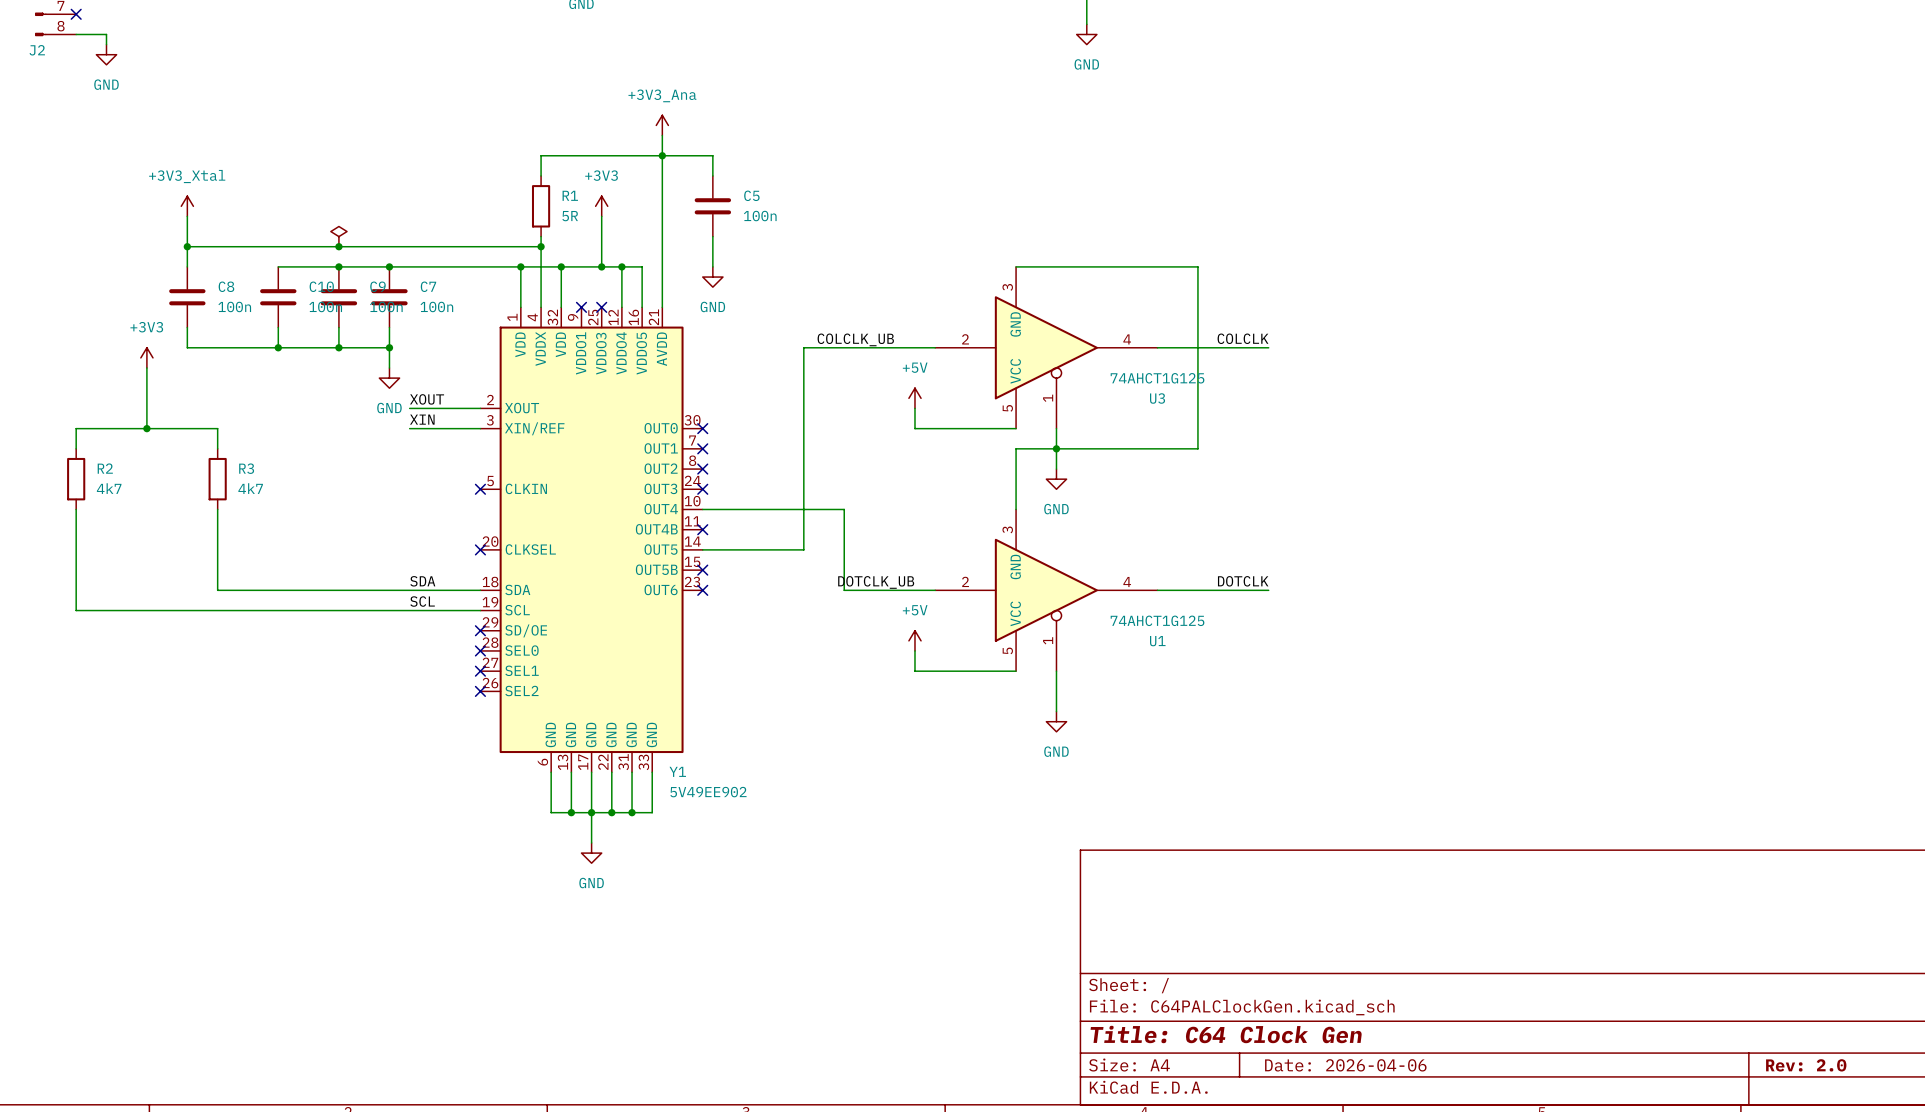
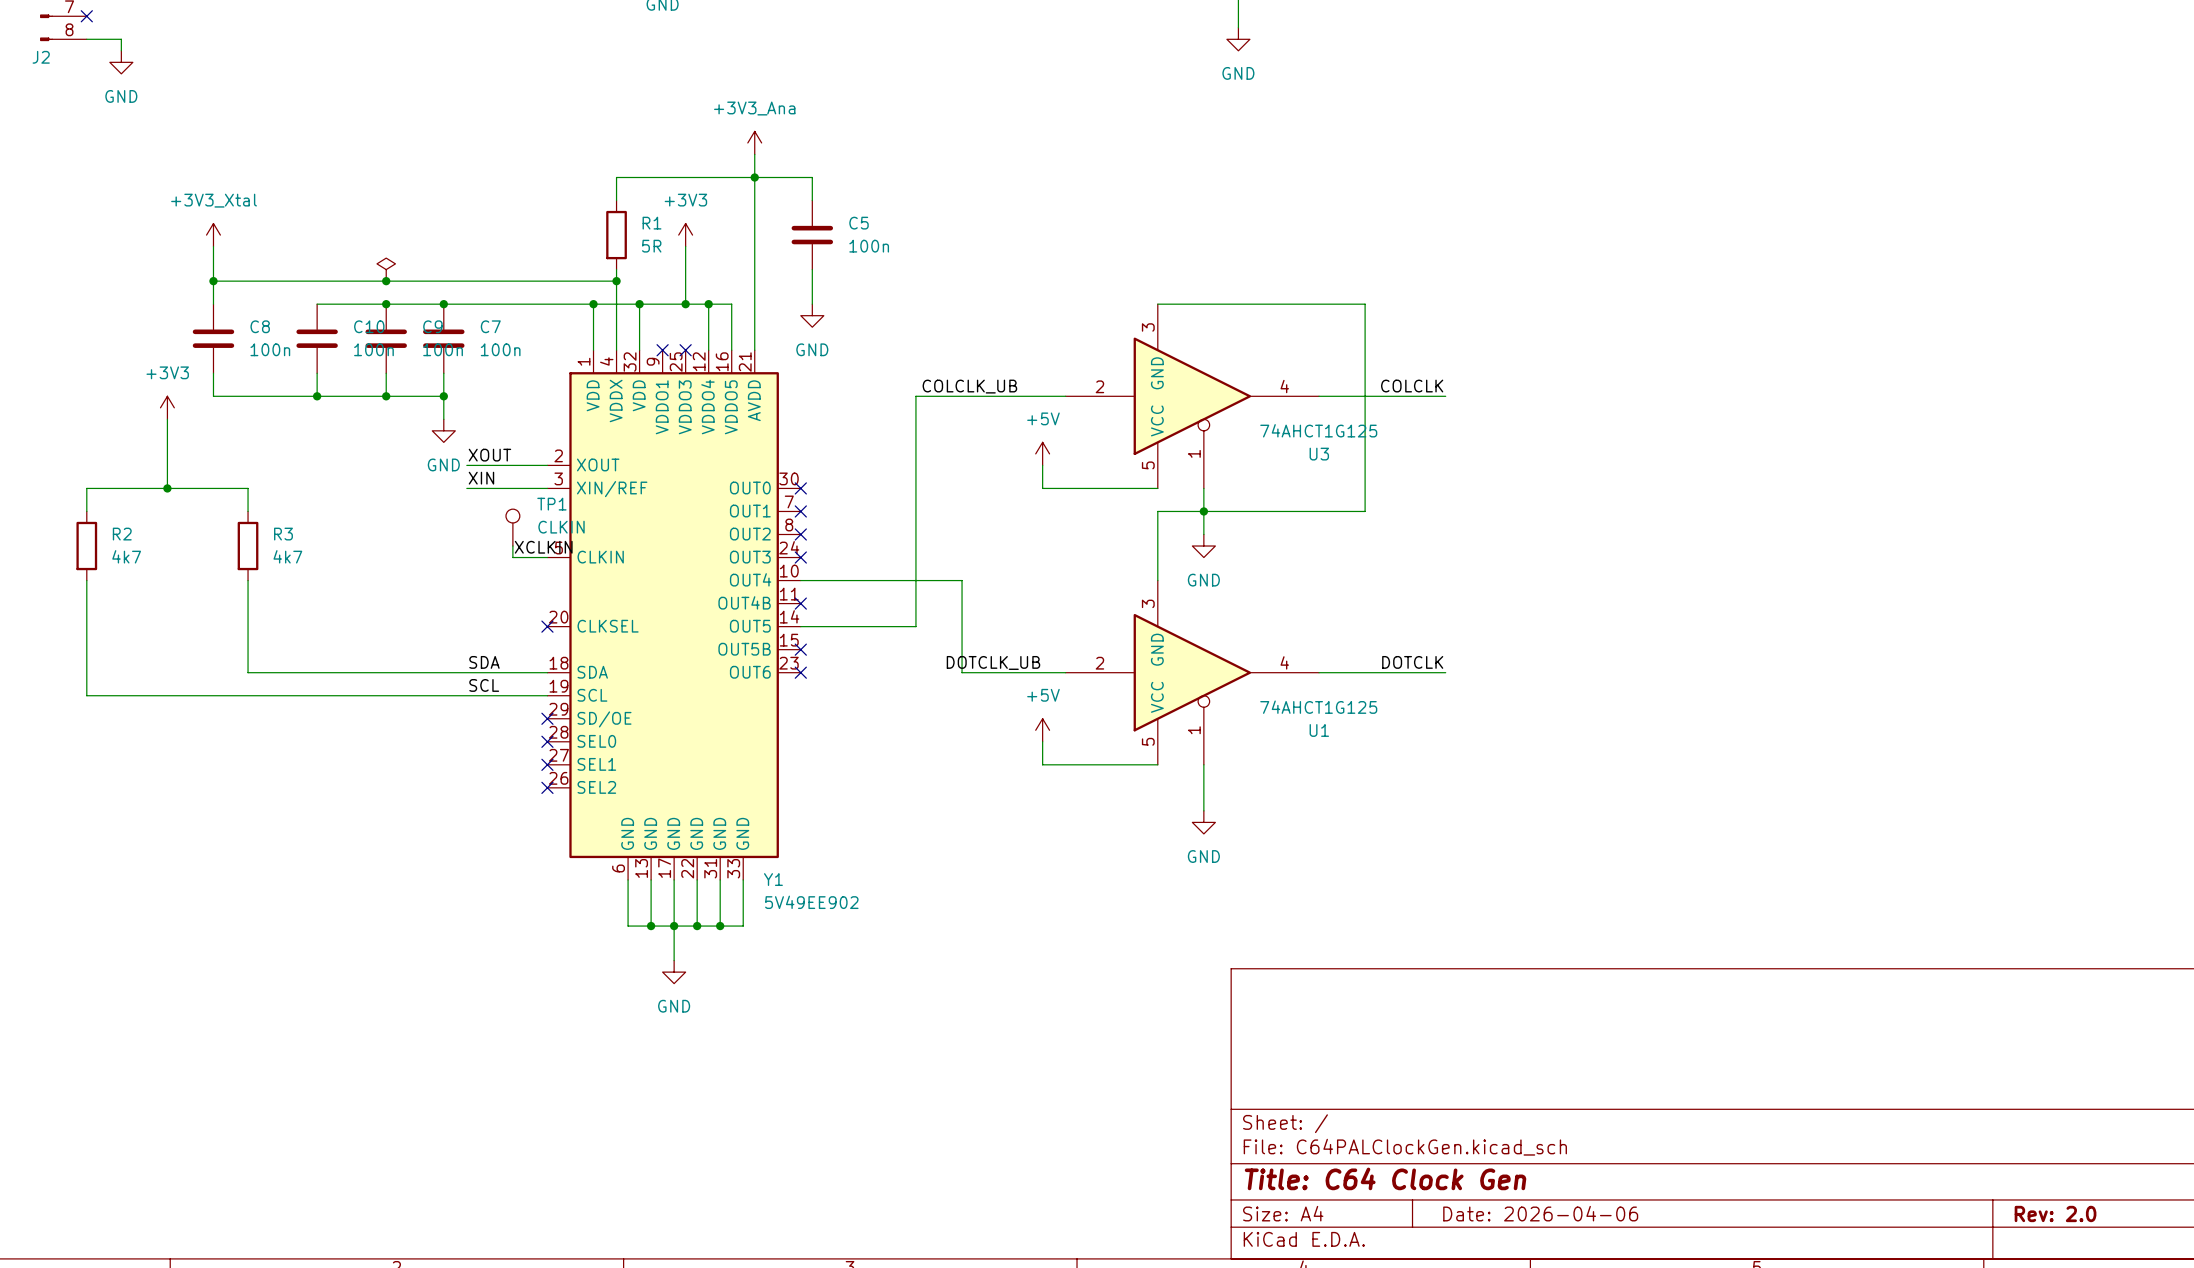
TP1: none -> CLKIN (512, 527)
wire: none -> (512, 546) (512, 557) (547, 557)
label: none -> XCLKIN (543, 547)
no-connect mark: (480, 489) -> none

